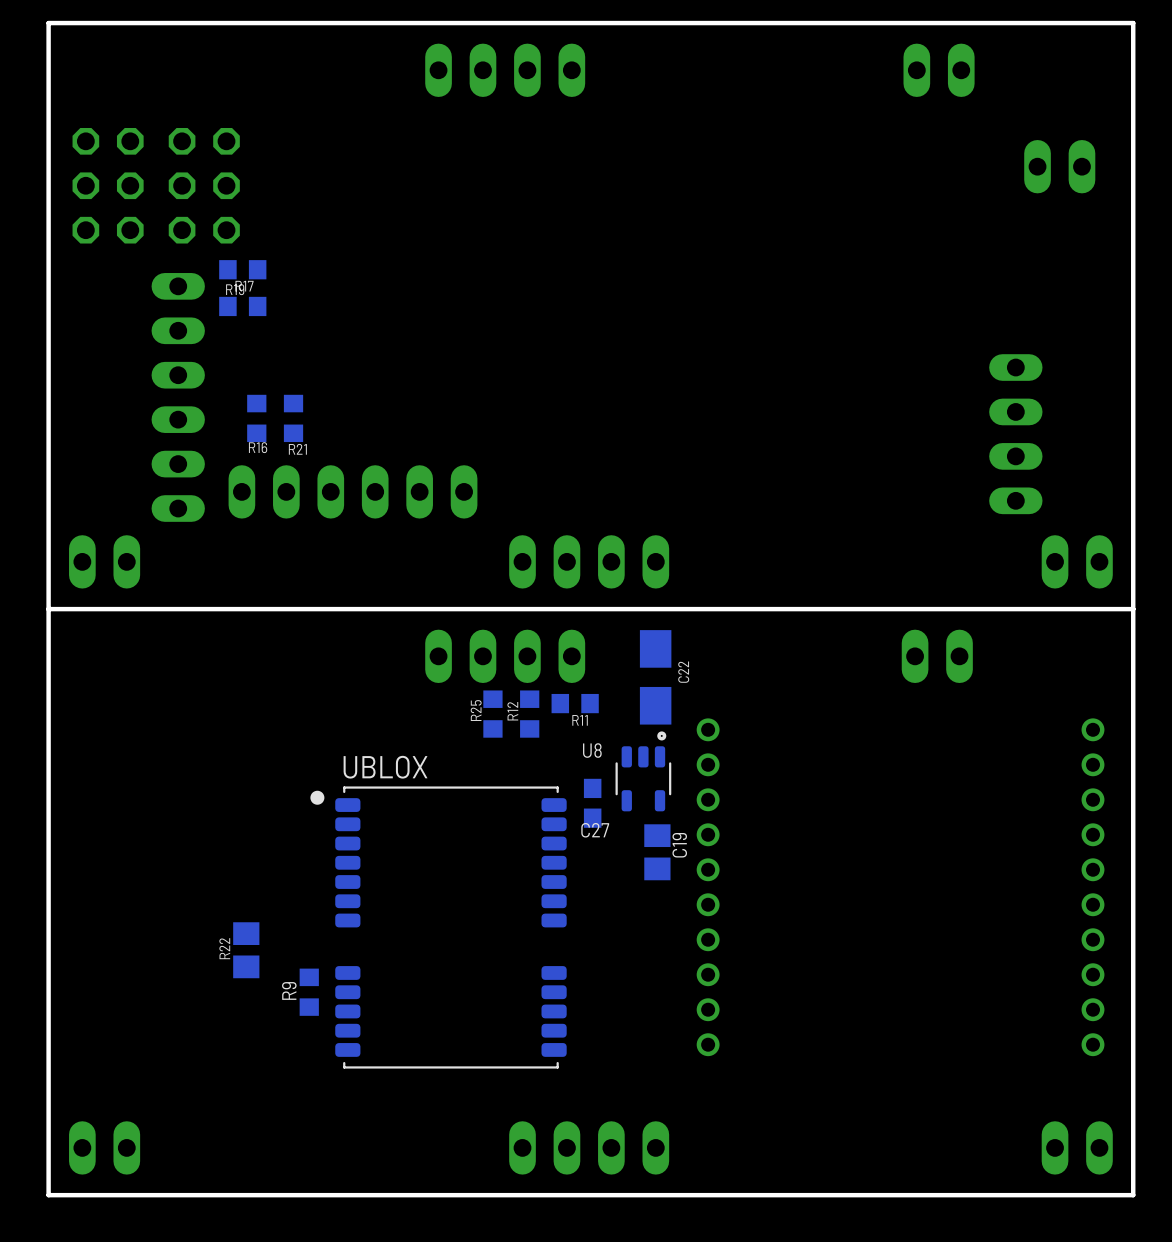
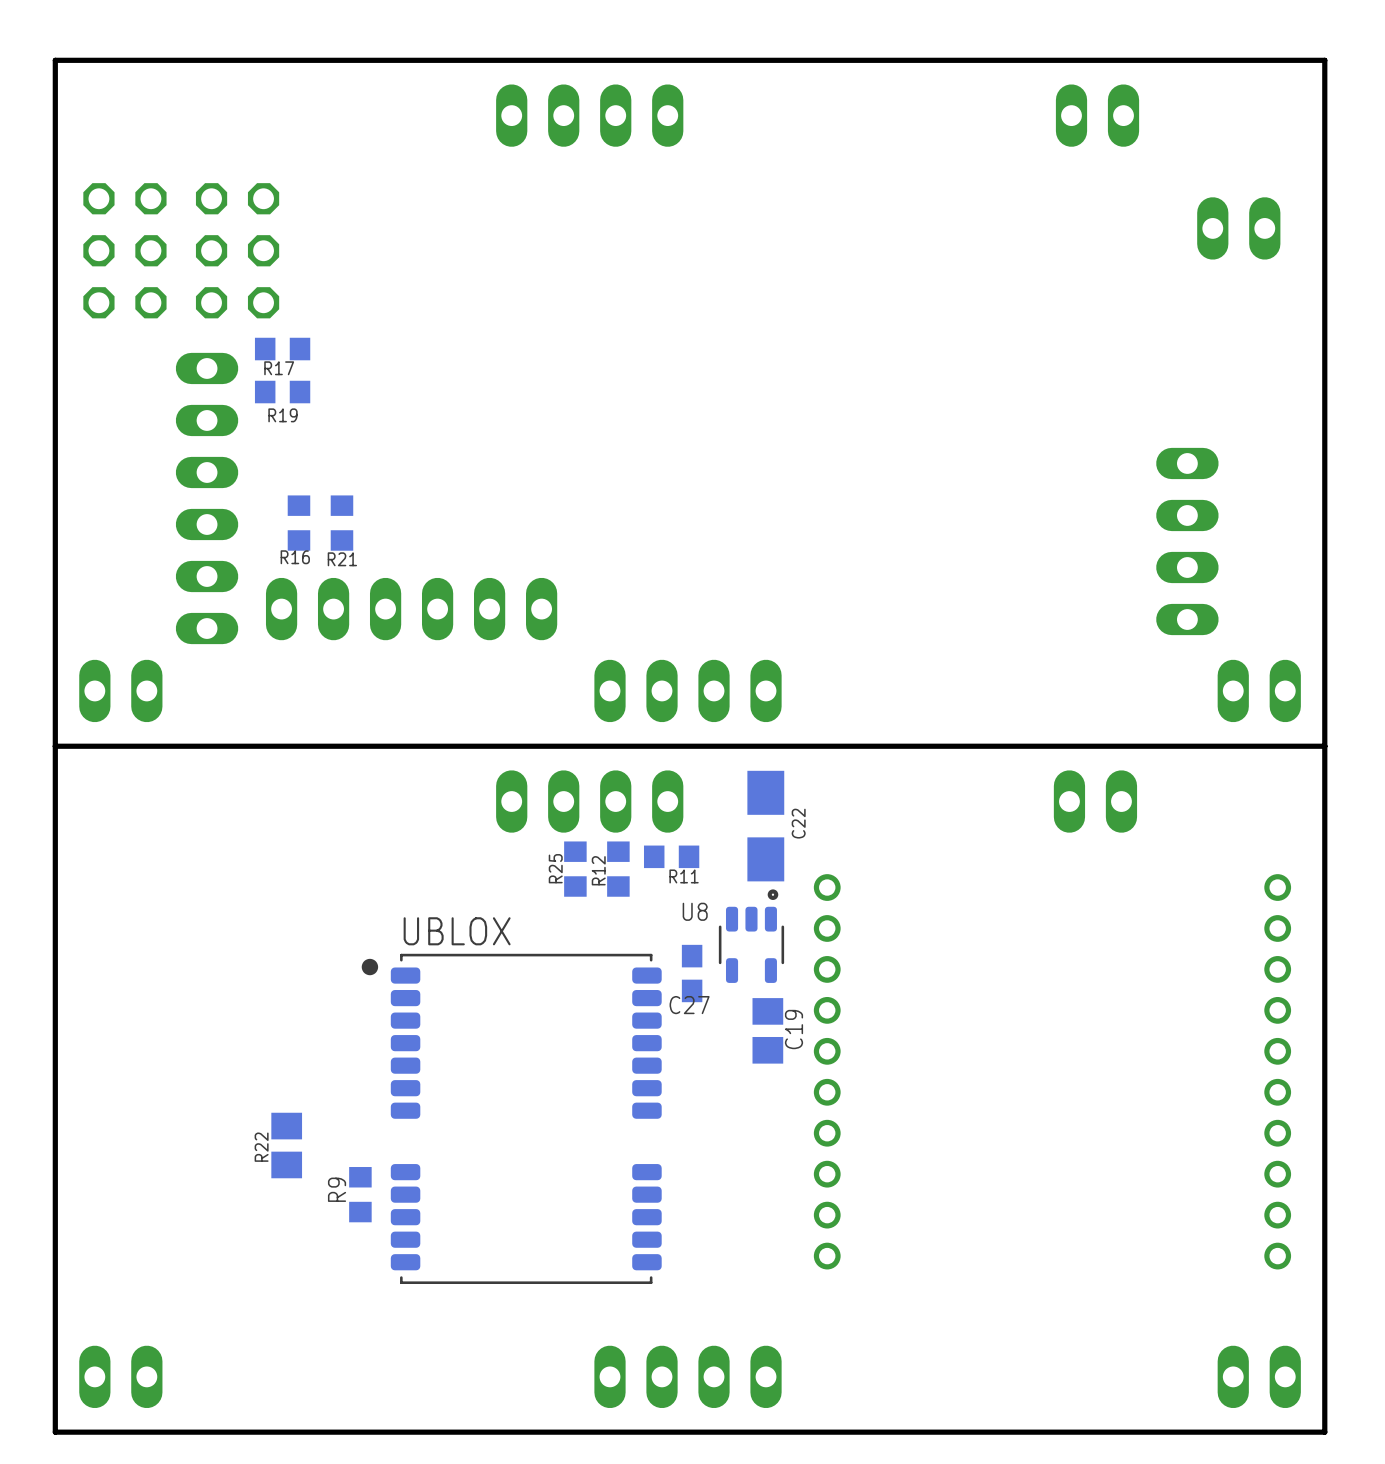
R19 name position: R19 (235, 289) -> R19 (282, 415)

